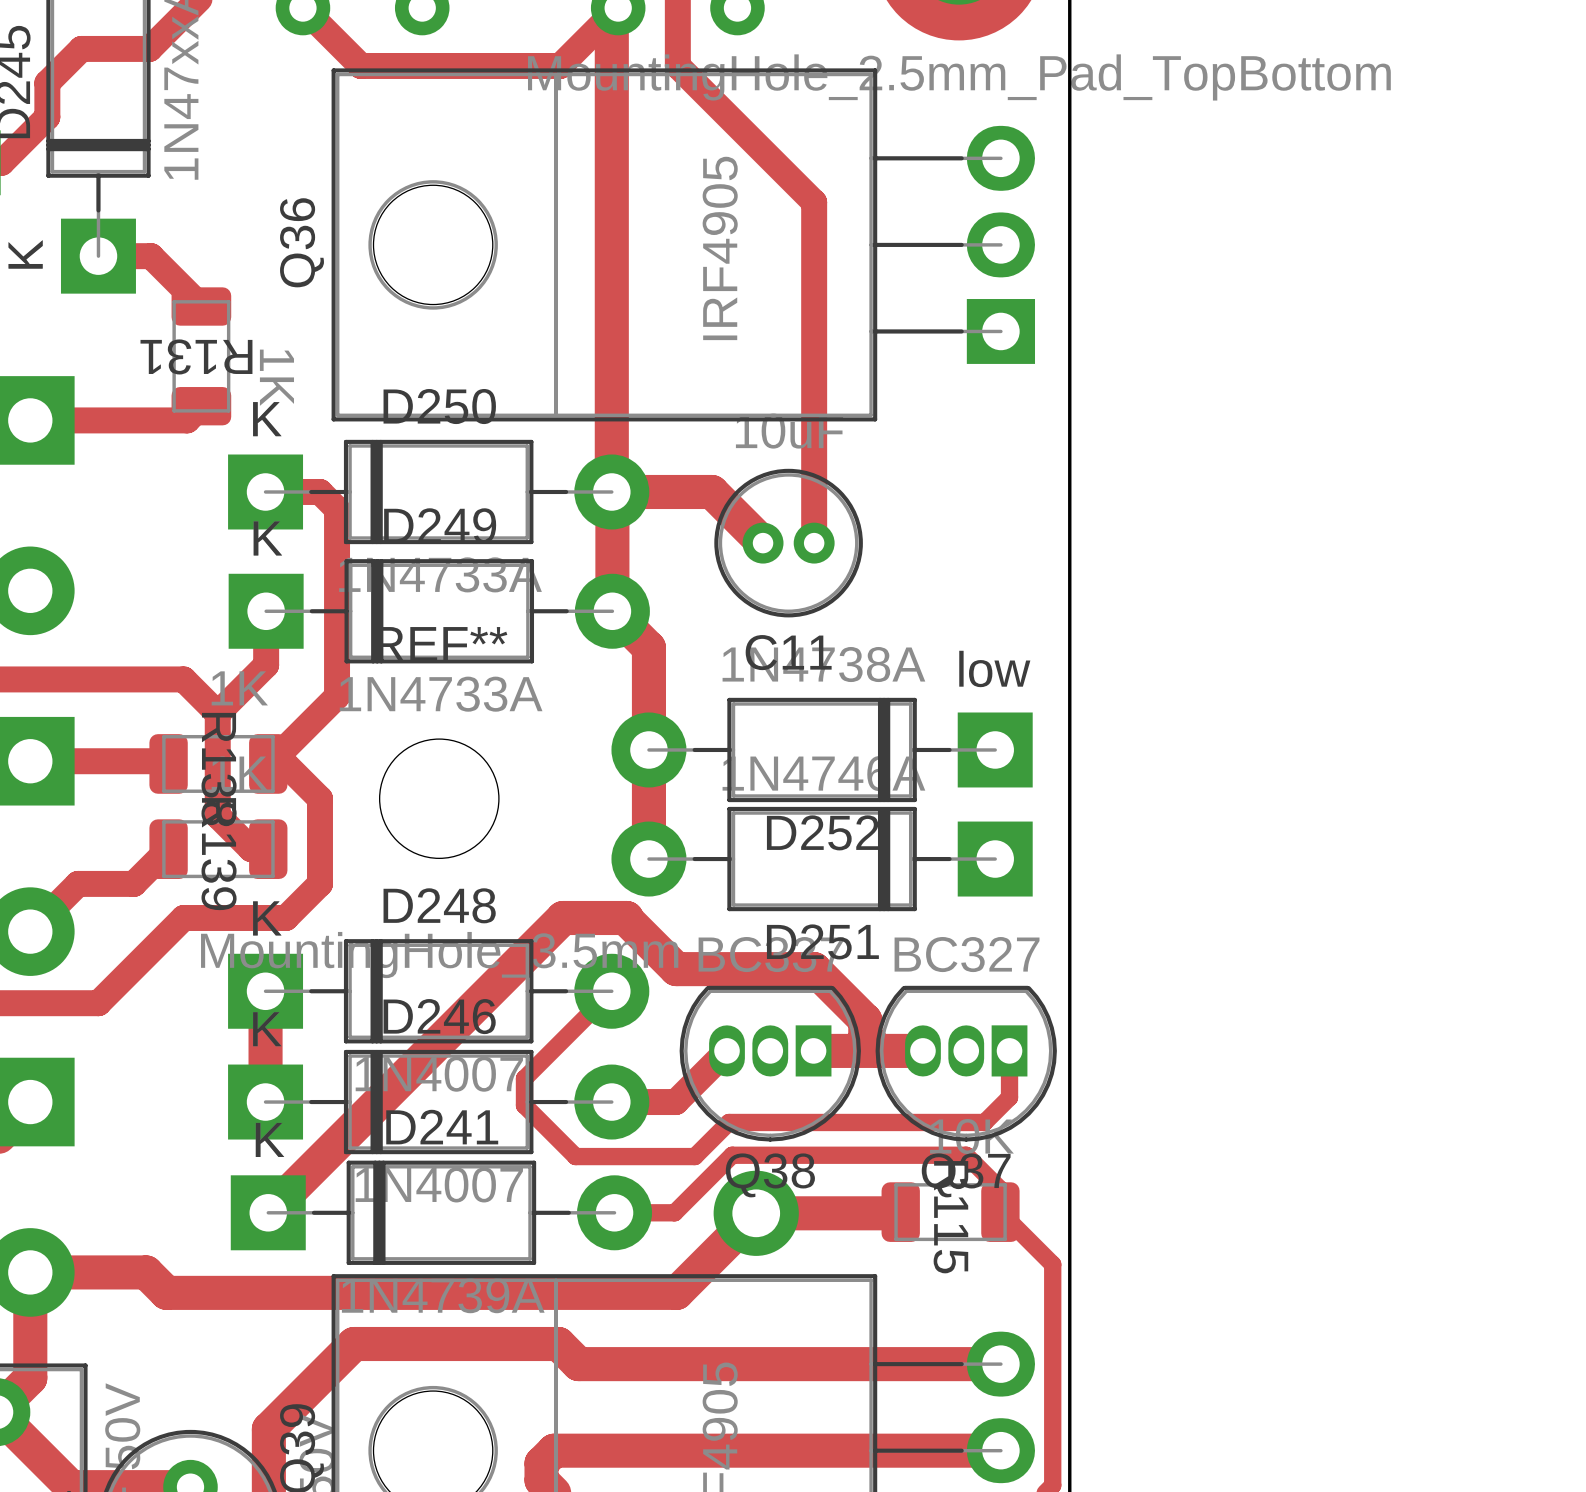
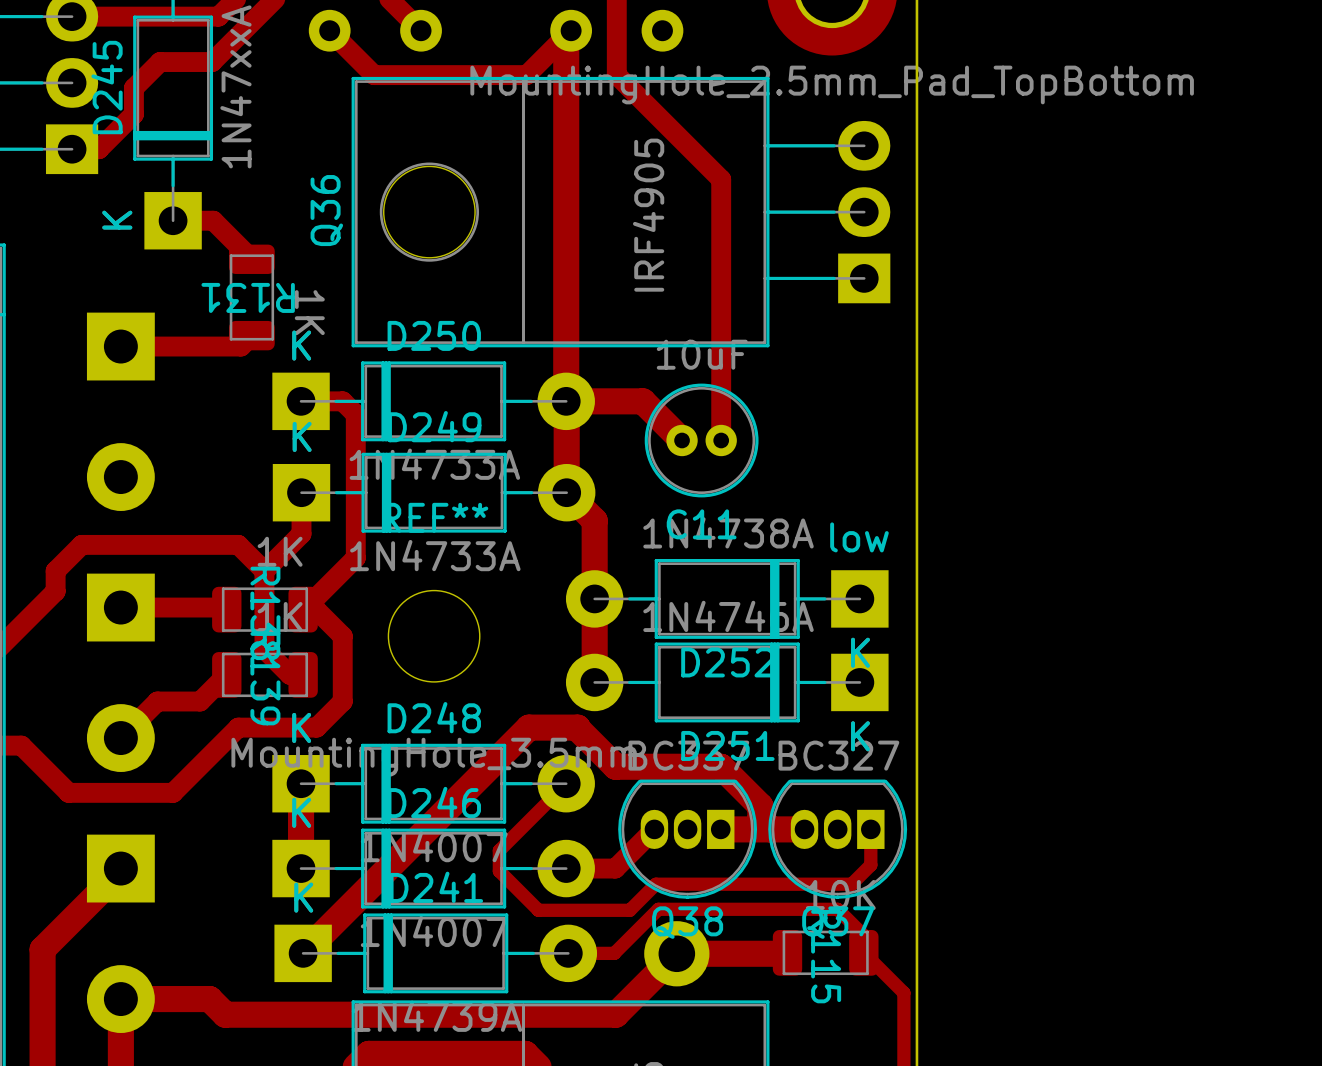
D252 footprint: [611, 697, 1033, 803] -> [565, 559, 889, 639]
D251 footprint: [611, 806, 1033, 912] -> [565, 642, 889, 723]

